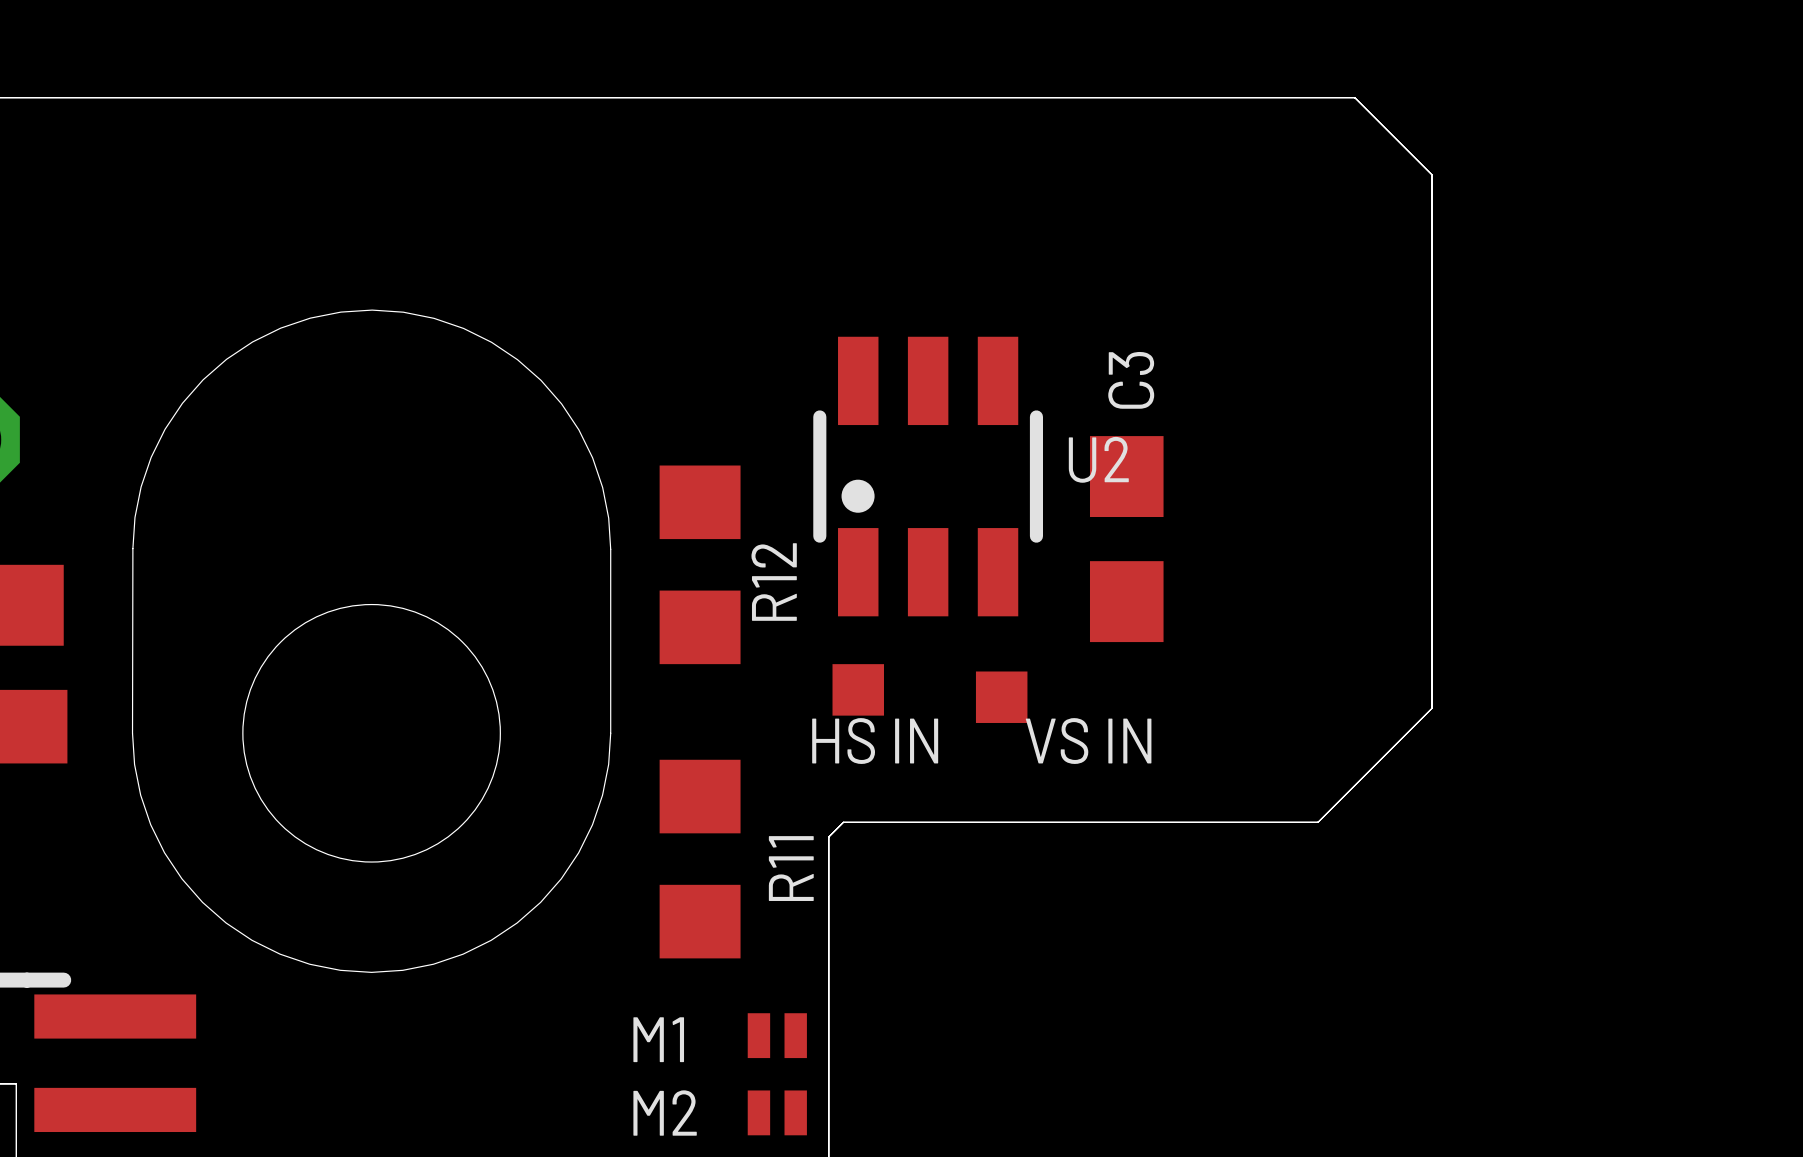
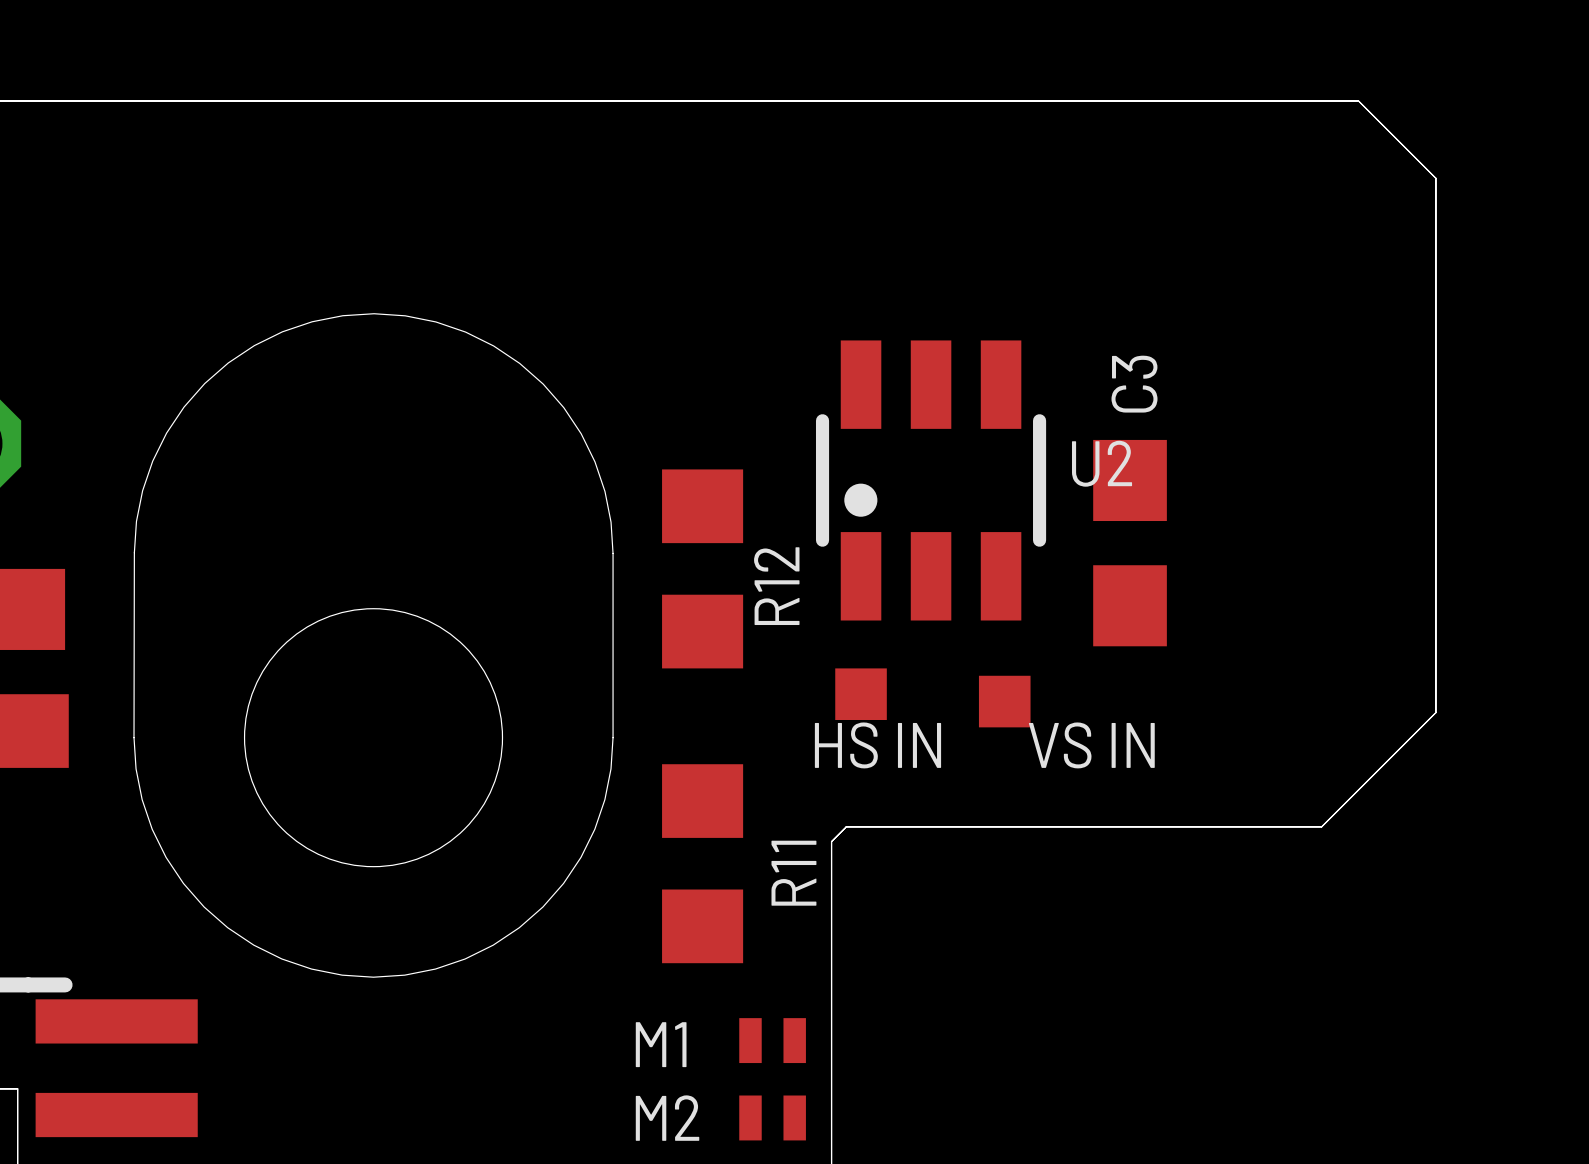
part footprint: [747, 1013, 807, 1059] -> [739, 1018, 806, 1064]
part footprint: [747, 1090, 807, 1136] -> [739, 1095, 806, 1141]

